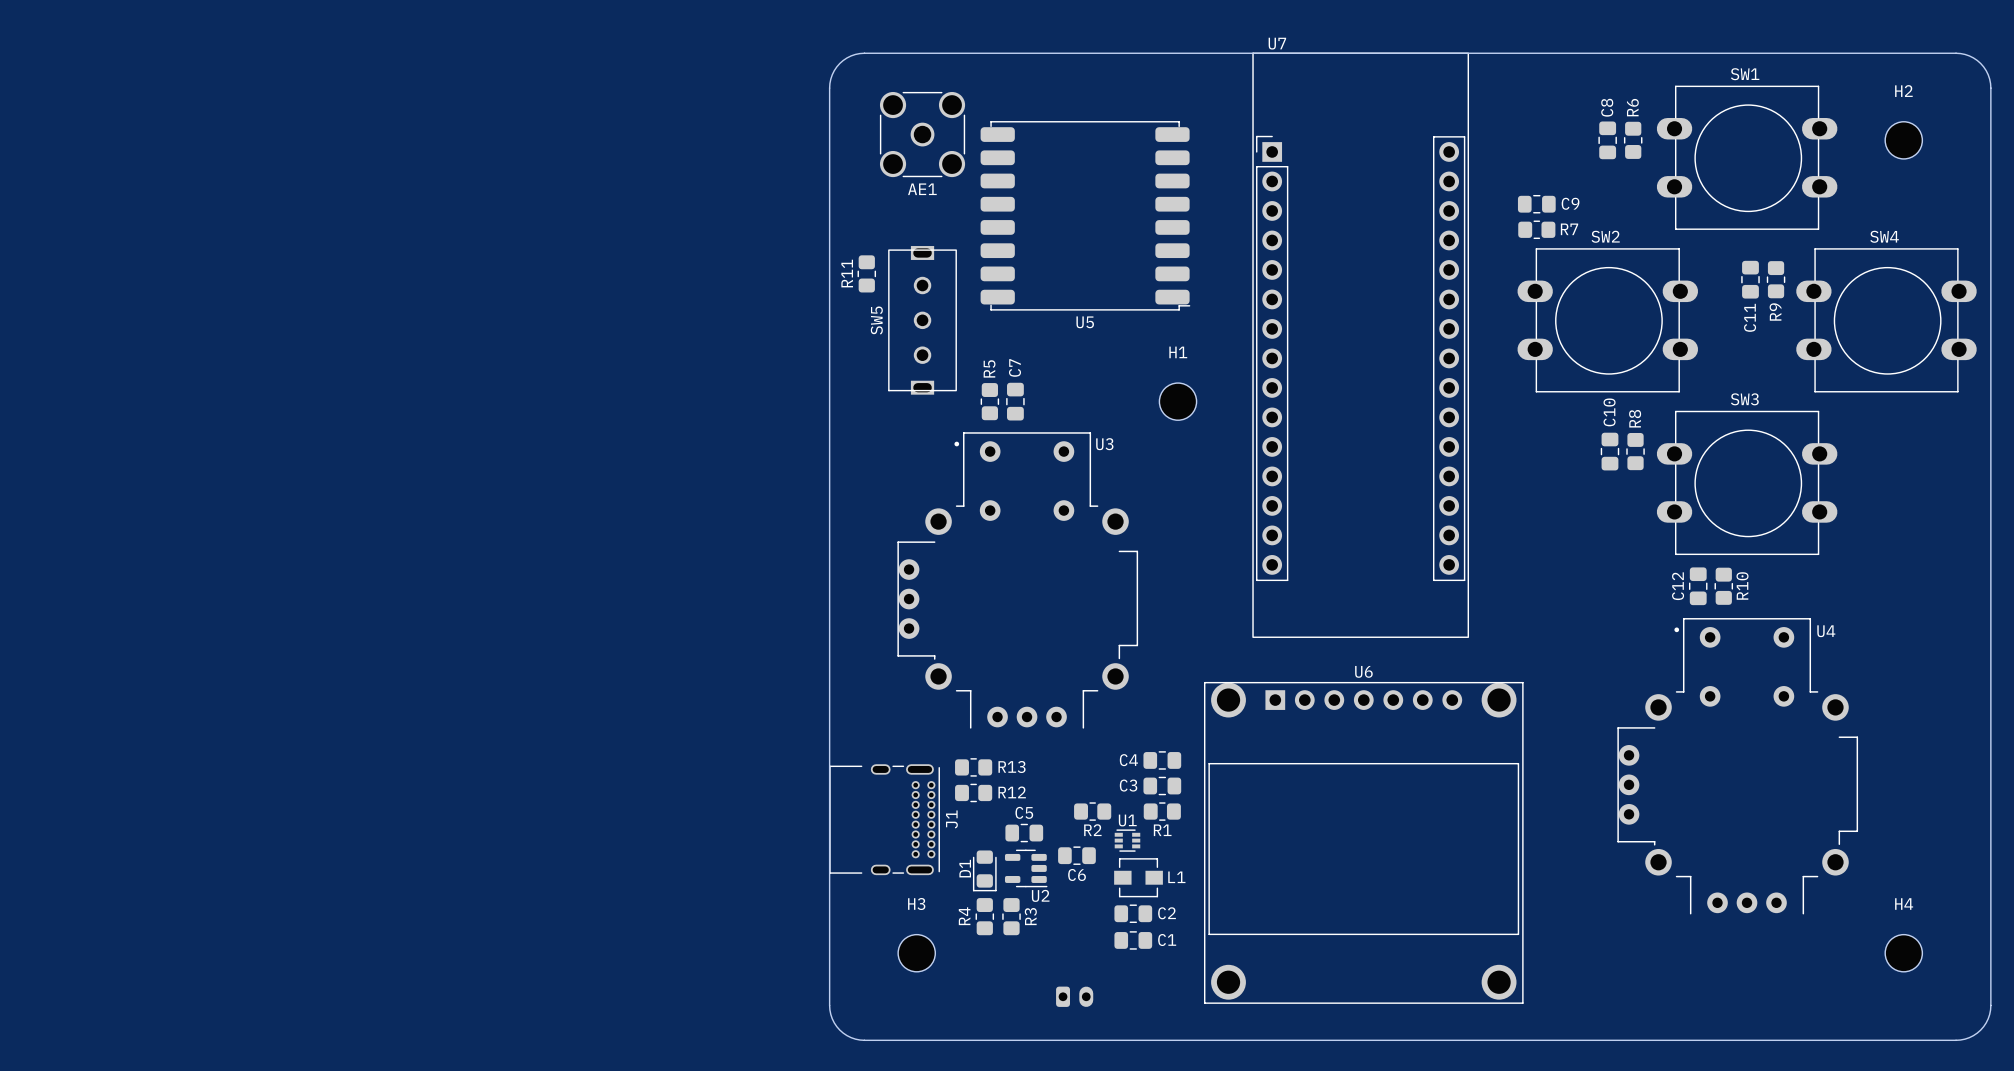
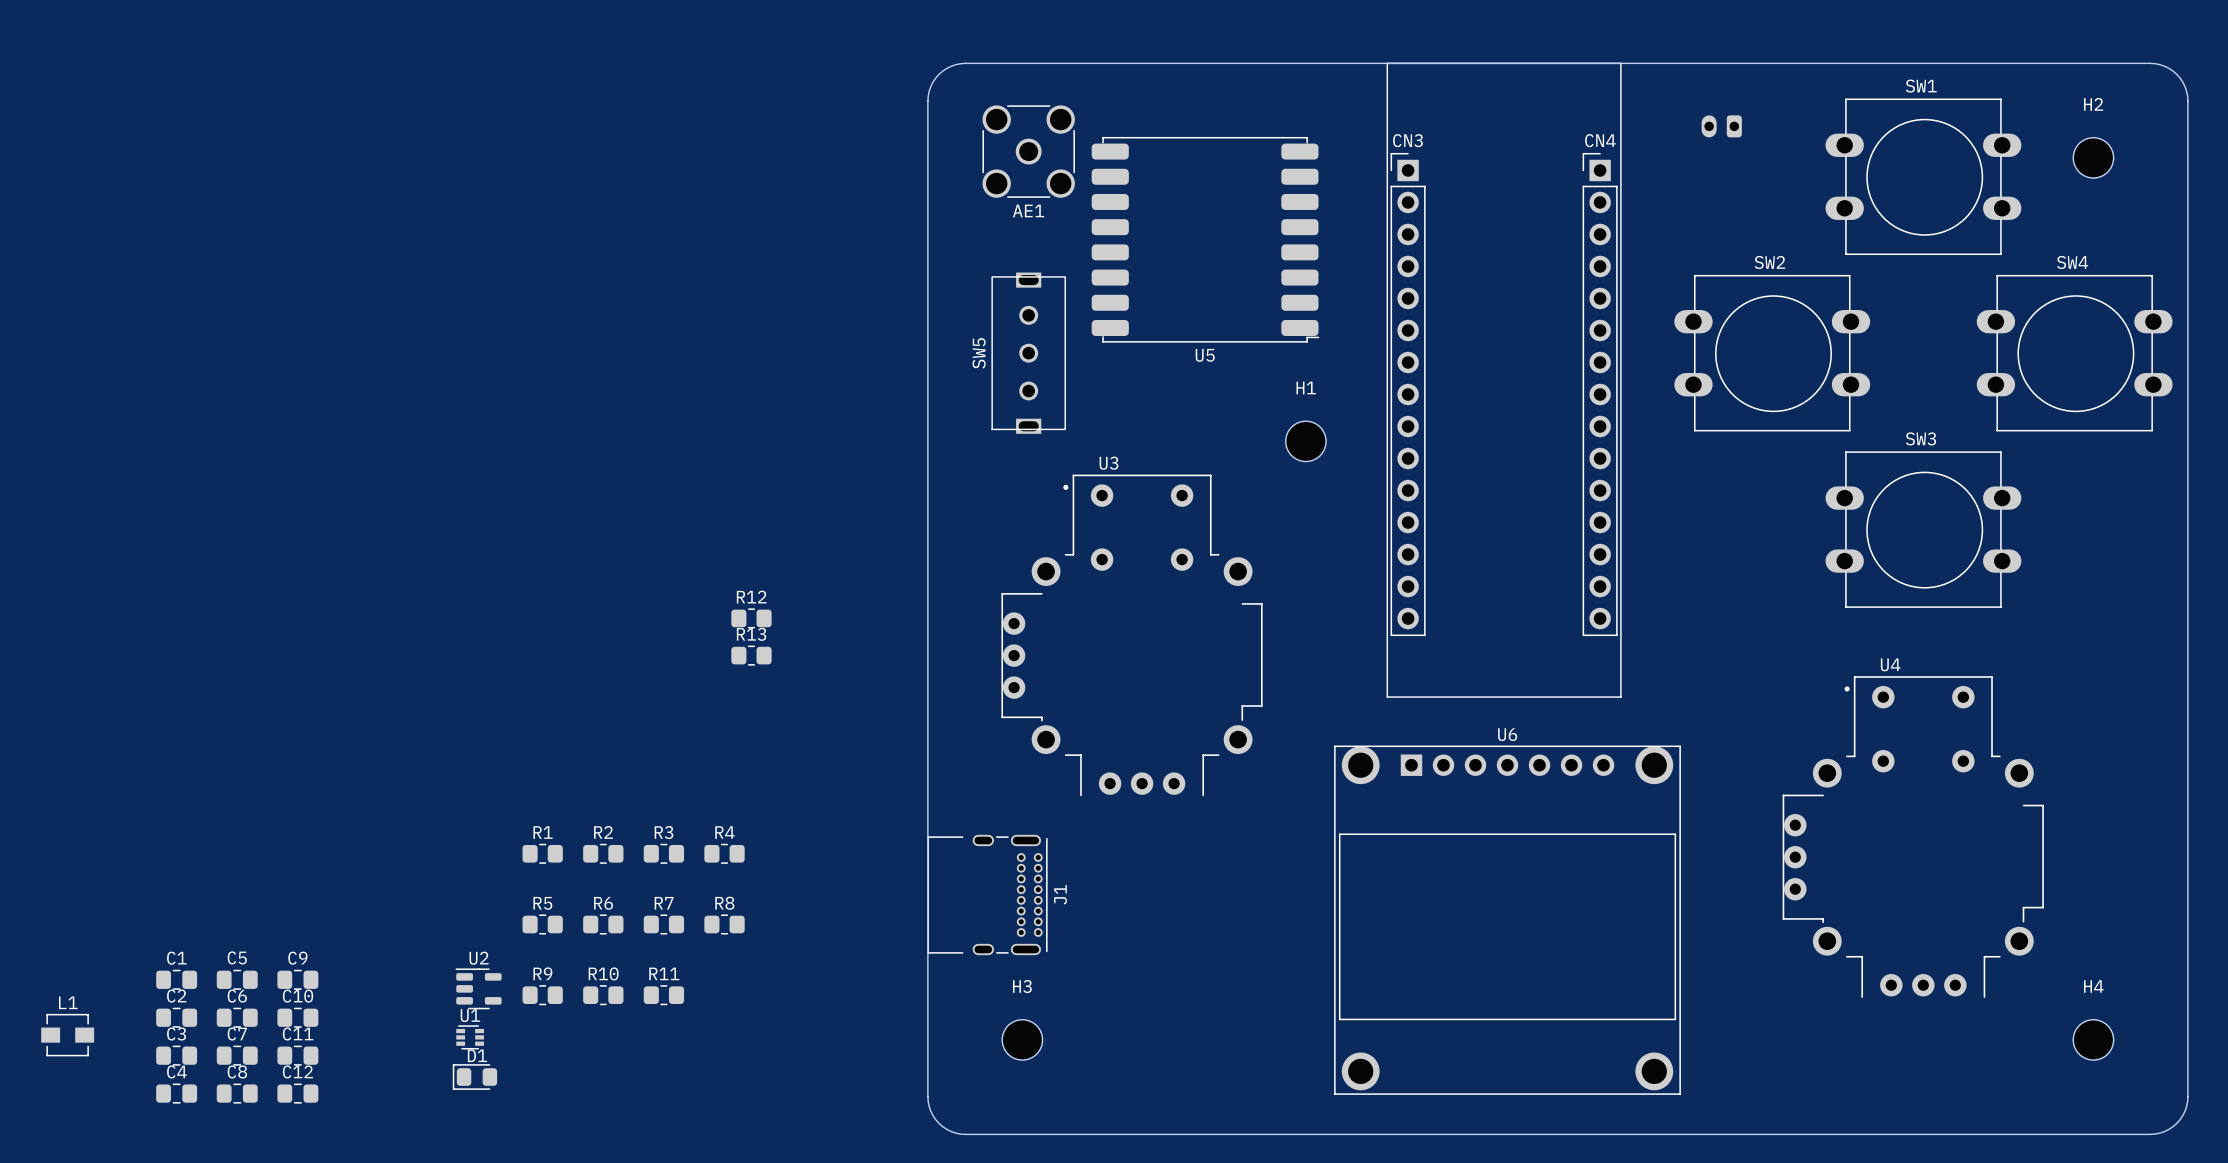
line: none -> (1387, 63) (1620, 63) (1620, 697) (1387, 697) (1387, 63)
part: none -> (1721, 126)
C8 rotation: 0° (1607, 140) -> 90° clockwise (237, 1093)
C8 position: (1607, 140) -> (237, 1093)
R6 rotation: 0° (1633, 140) -> 90° clockwise (603, 924)
R6 position: (1633, 140) -> (603, 924)
C9 name position: C9 (1570, 203) -> C9 (297, 958)
C9 position: (1536, 204) -> (297, 979)
R7 position: (1536, 229) -> (663, 924)
R7 name position: R7 (1569, 229) -> R7 (664, 903)
R11 rotation: 0° (866, 273) -> 90° clockwise (663, 995)
R11 position: (866, 273) -> (663, 995)
C11 rotation: 0° (1750, 279) -> 90° clockwise (297, 1055)
C11 position: (1750, 279) -> (297, 1055)
R9 rotation: 0° (1776, 279) -> 90° clockwise (542, 995)
R9 position: (1776, 279) -> (542, 995)
R9 name position: R9 (1775, 312) -> R9 (542, 973)
C11 name position: C11 (1750, 317) -> C11 (298, 1034)
U7: (1360, 345) -> none
CN3: none -> (1408, 394)
CN4: none -> (1600, 394)
R5 rotation: 0° (989, 401) -> 90° clockwise (542, 924)
R5 position: (989, 401) -> (542, 924)
C7 rotation: 0° (1015, 401) -> 90° clockwise (237, 1055)
C7 position: (1015, 401) -> (237, 1055)
U3 name position: U3 (1104, 444) -> U3 (1109, 463)
C10 rotation: 0° (1609, 451) -> 90° clockwise (297, 1017)
C10 position: (1609, 451) -> (297, 1017)
R8 rotation: 0° (1635, 451) -> 90° clockwise (724, 924)
R8 position: (1635, 451) -> (724, 924)
R10 name position: R10 (1742, 585) -> R10 (603, 973)
C12 rotation: 0° (1698, 586) -> 90° clockwise (297, 1093)
C12 position: (1698, 586) -> (297, 1093)
R10 rotation: 0° (1723, 586) -> 90° clockwise (603, 995)
R10 position: (1723, 586) -> (603, 995)
U4 name position: U4 (1826, 631) -> U4 (1890, 664)
C4 name position: C4 (1128, 760) -> C4 (176, 1071)
C4 position: (1162, 760) -> (176, 1093)
R13 name position: R13 (1012, 766) -> R13 (751, 634)
R13 position: (973, 767) -> (751, 655)
C3 name position: C3 (1128, 785) -> C3 (176, 1034)
C3 position: (1162, 786) -> (176, 1055)
R12 position: (973, 792) -> (751, 618)
R12 name position: R12 (1012, 792) -> R12 (751, 597)
R2 position: (1092, 811) -> (603, 853)
R1 position: (1162, 811) -> (542, 853)
R2 name position: R2 (1092, 830) -> R2 (603, 832)
R1 name position: R1 (1162, 830) -> R1 (543, 832)
C5 position: (1024, 833) -> (237, 979)
U1 position: (1127, 840) -> (470, 1037)
C6 position: (1076, 855) -> (237, 1017)
U2 rotation: 0° (1026, 868) -> 180° (478, 988)
U2 position: (1026, 868) -> (478, 988)
D1 rotation: 0° (984, 870) -> 90° clockwise (474, 1077)
D1 position: (984, 870) -> (474, 1077)
C6 name position: C6 (1077, 874) -> C6 (237, 996)
L1 position: (1138, 877) -> (67, 1035)
L1 name position: L1 (1176, 877) -> L1 (68, 1002)
C2 position: (1133, 913) -> (176, 1017)
C2 name position: C2 (1167, 913) -> C2 (176, 996)
R4 rotation: 0° (984, 916) -> 90° clockwise (724, 853)
R4 position: (984, 916) -> (724, 853)
R3 rotation: 0° (1011, 916) -> 90° clockwise (663, 853)
R3 position: (1011, 916) -> (663, 853)
R3 name position: R3 (1030, 916) -> R3 (663, 832)
C1 position: (1133, 940) -> (176, 979)
C1 name position: C1 (1167, 940) -> C1 (176, 958)
part: (1074, 996) -> none

